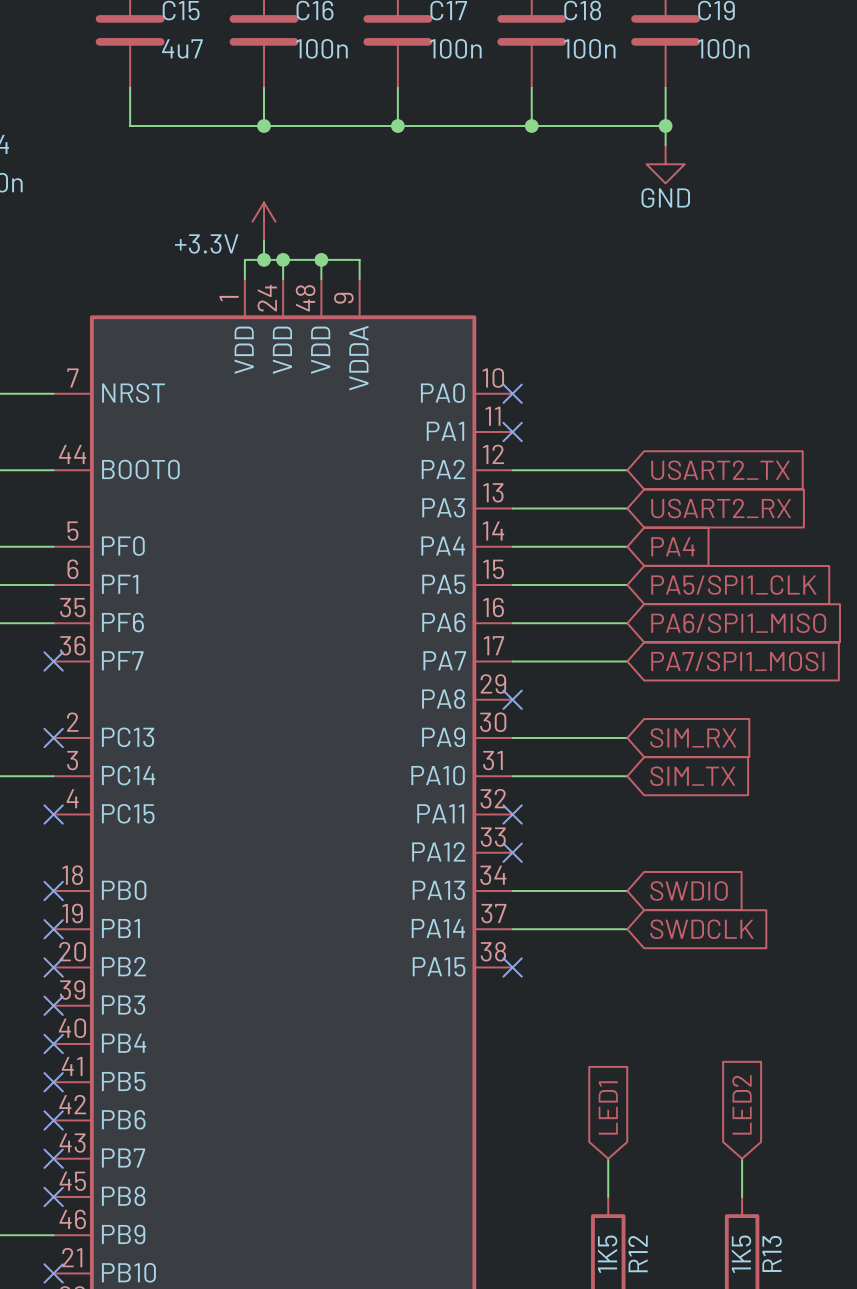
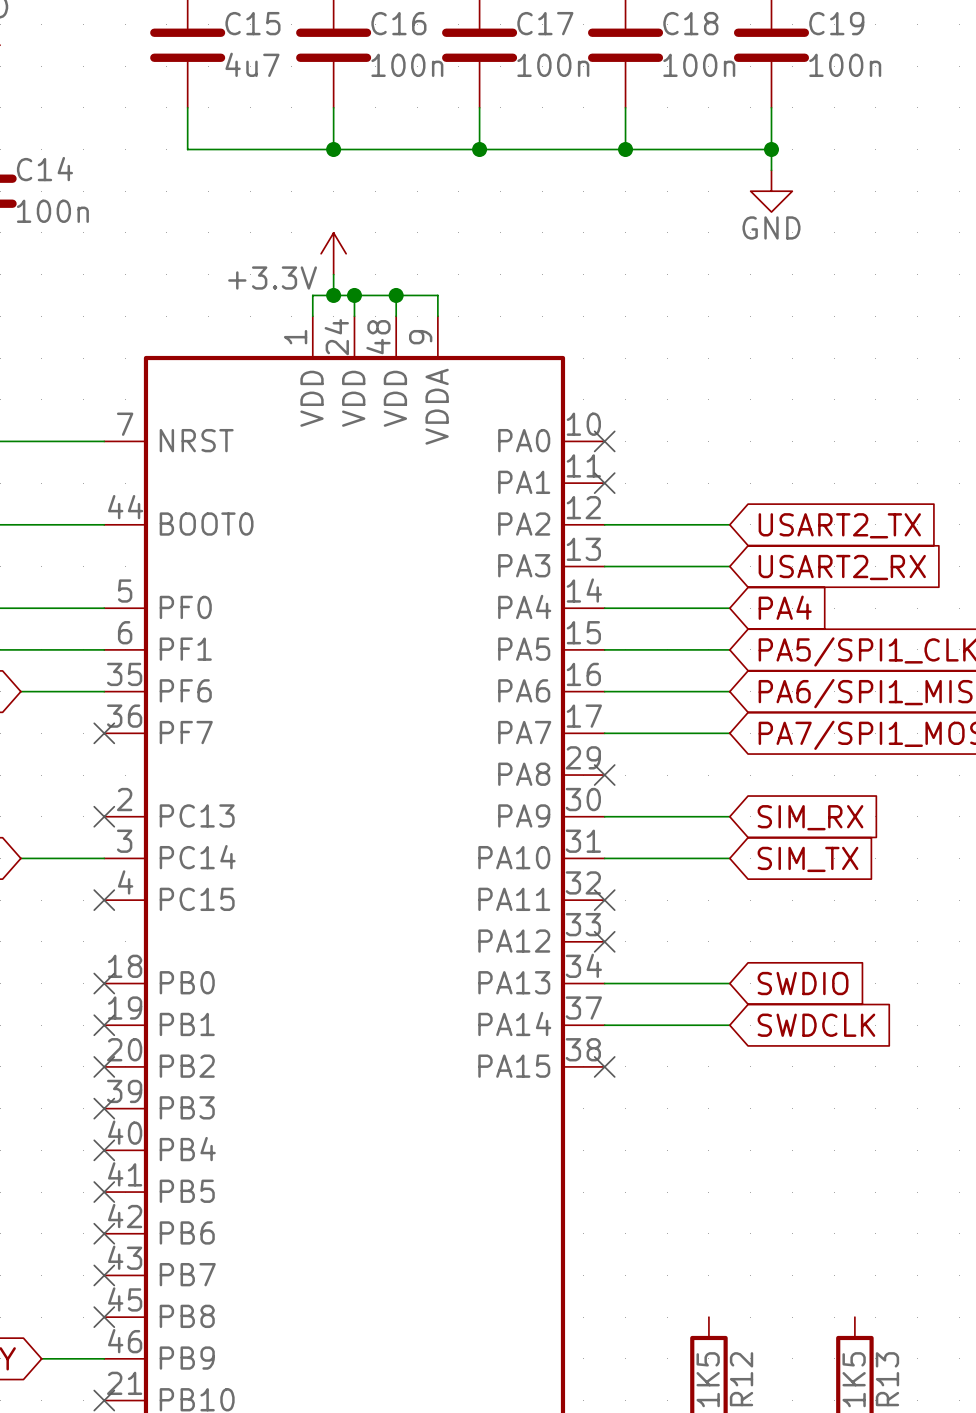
global label: LED2 (742, 1104) -> none
global label: LED1 (608, 1107) -> none
wire: (608, 1158) (608, 1196) -> none
wire: (742, 1158) (742, 1196) -> none

